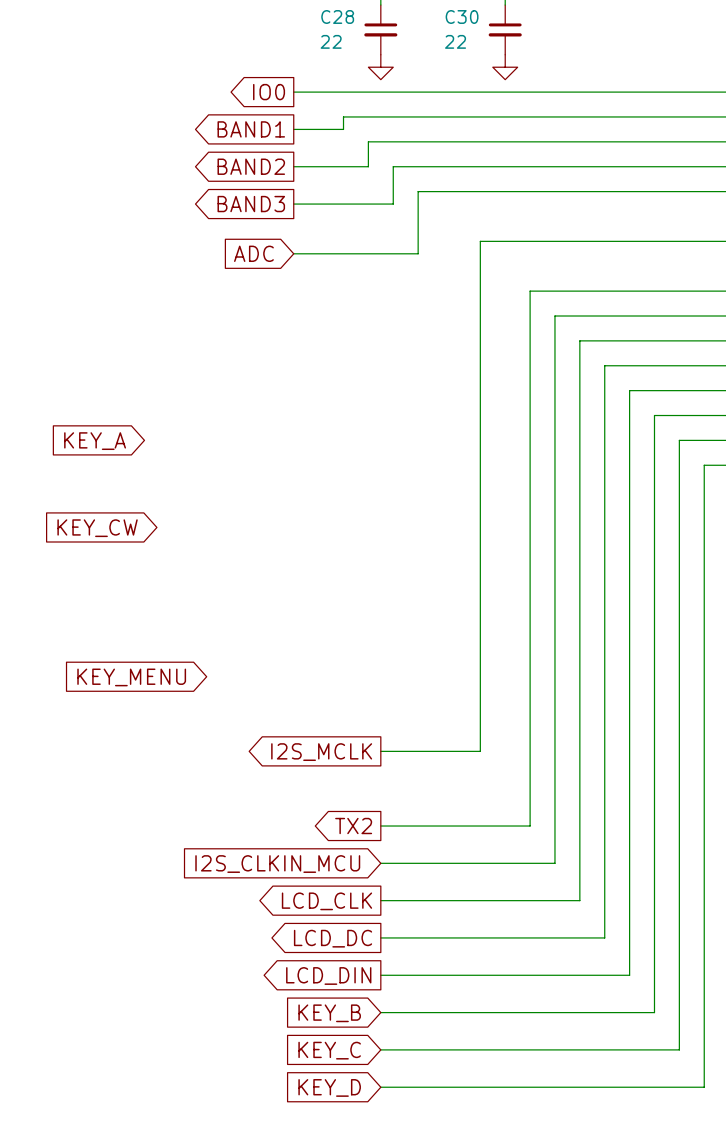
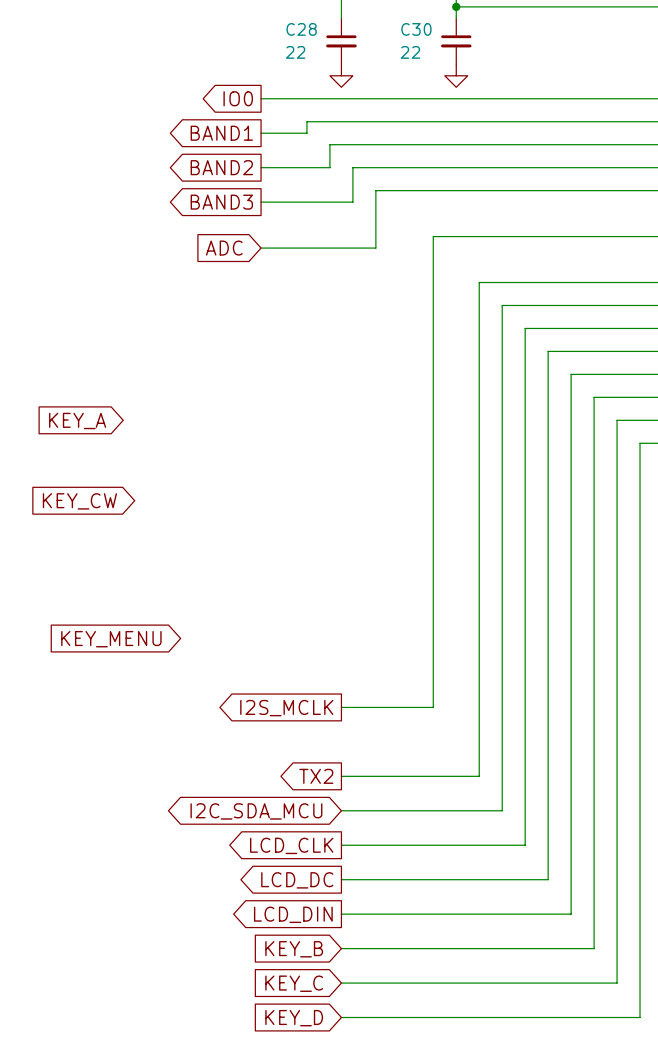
global label shape: input (277, 864) -> bidirectional (256, 811)
global label: I2S_CLKIN_MCU (277, 864) -> I2C_SDA_MCU (256, 811)

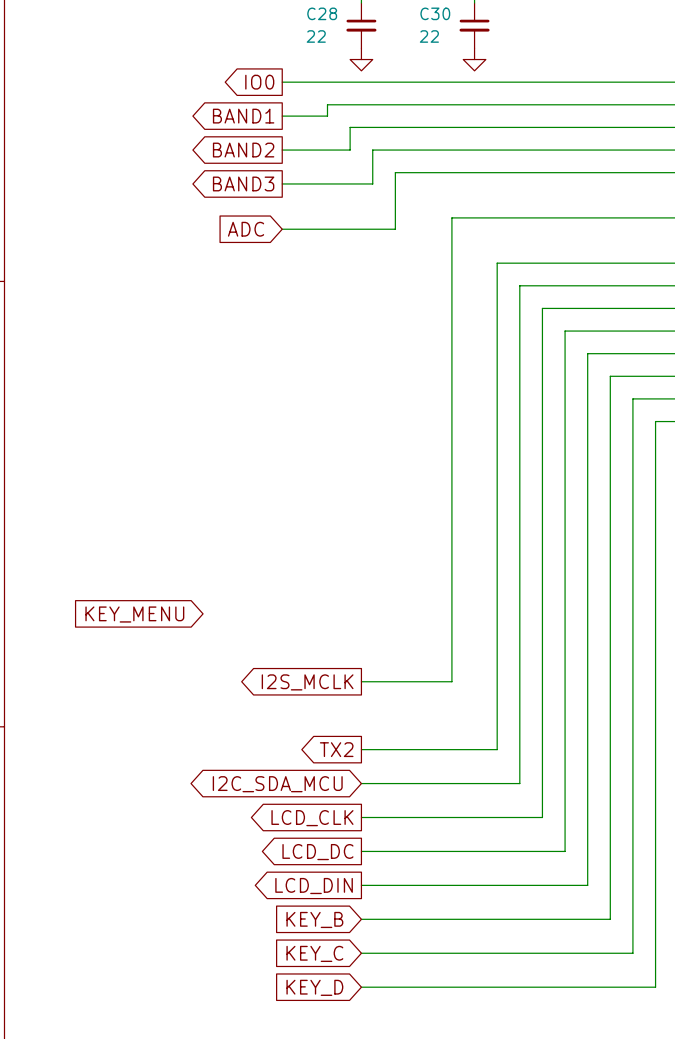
global label: KEY_A (77, 420) -> none
global label: KEY_CW (79, 501) -> none

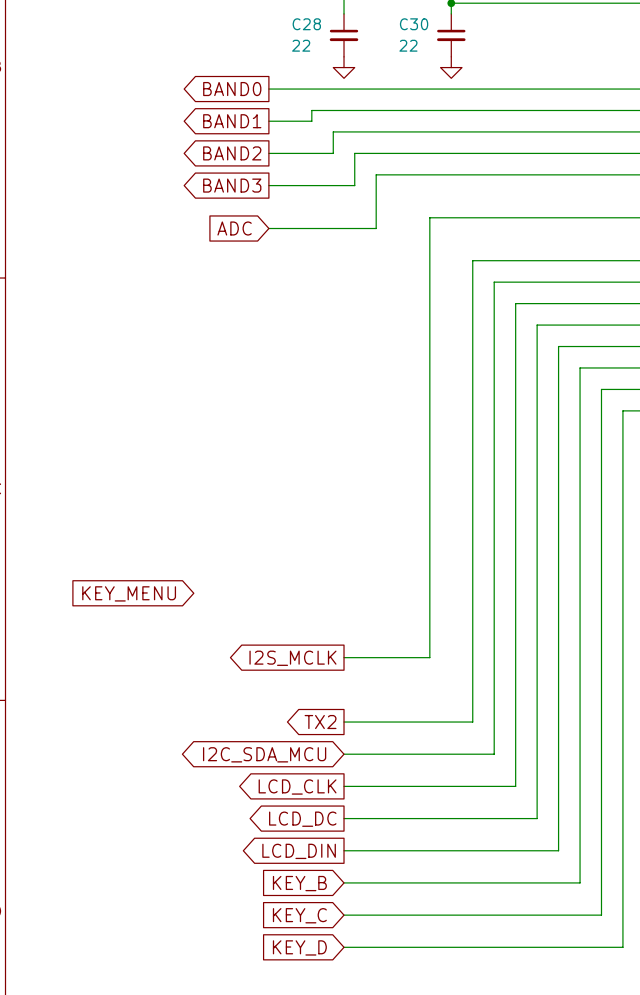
global label: IO0 (259, 82) -> BAND0 (232, 89)

